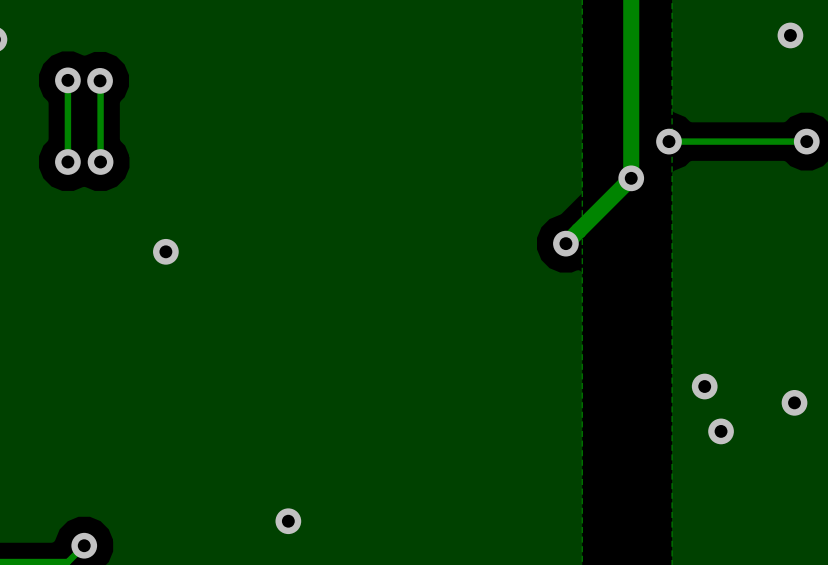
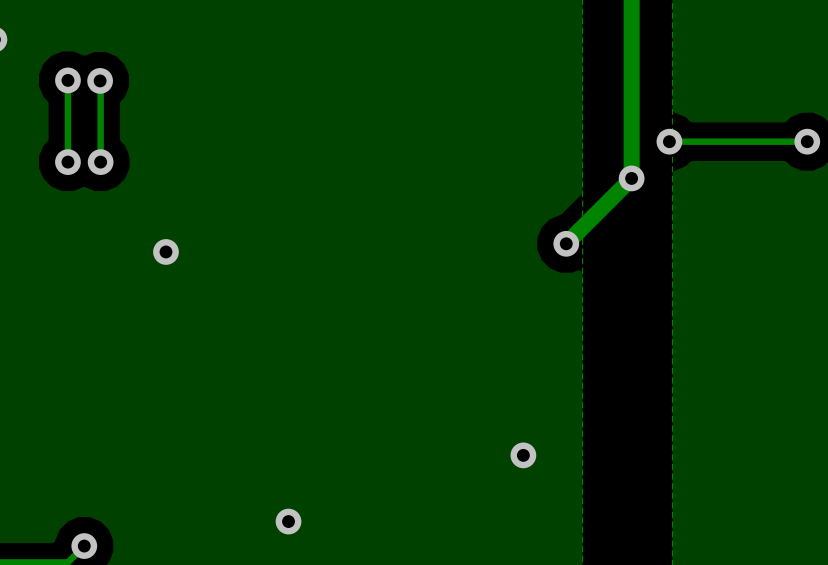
via: (790, 35) -> none
via: (704, 386) -> none
via: (794, 402) -> none
via: (721, 431) -> none
via: none -> (523, 455)

